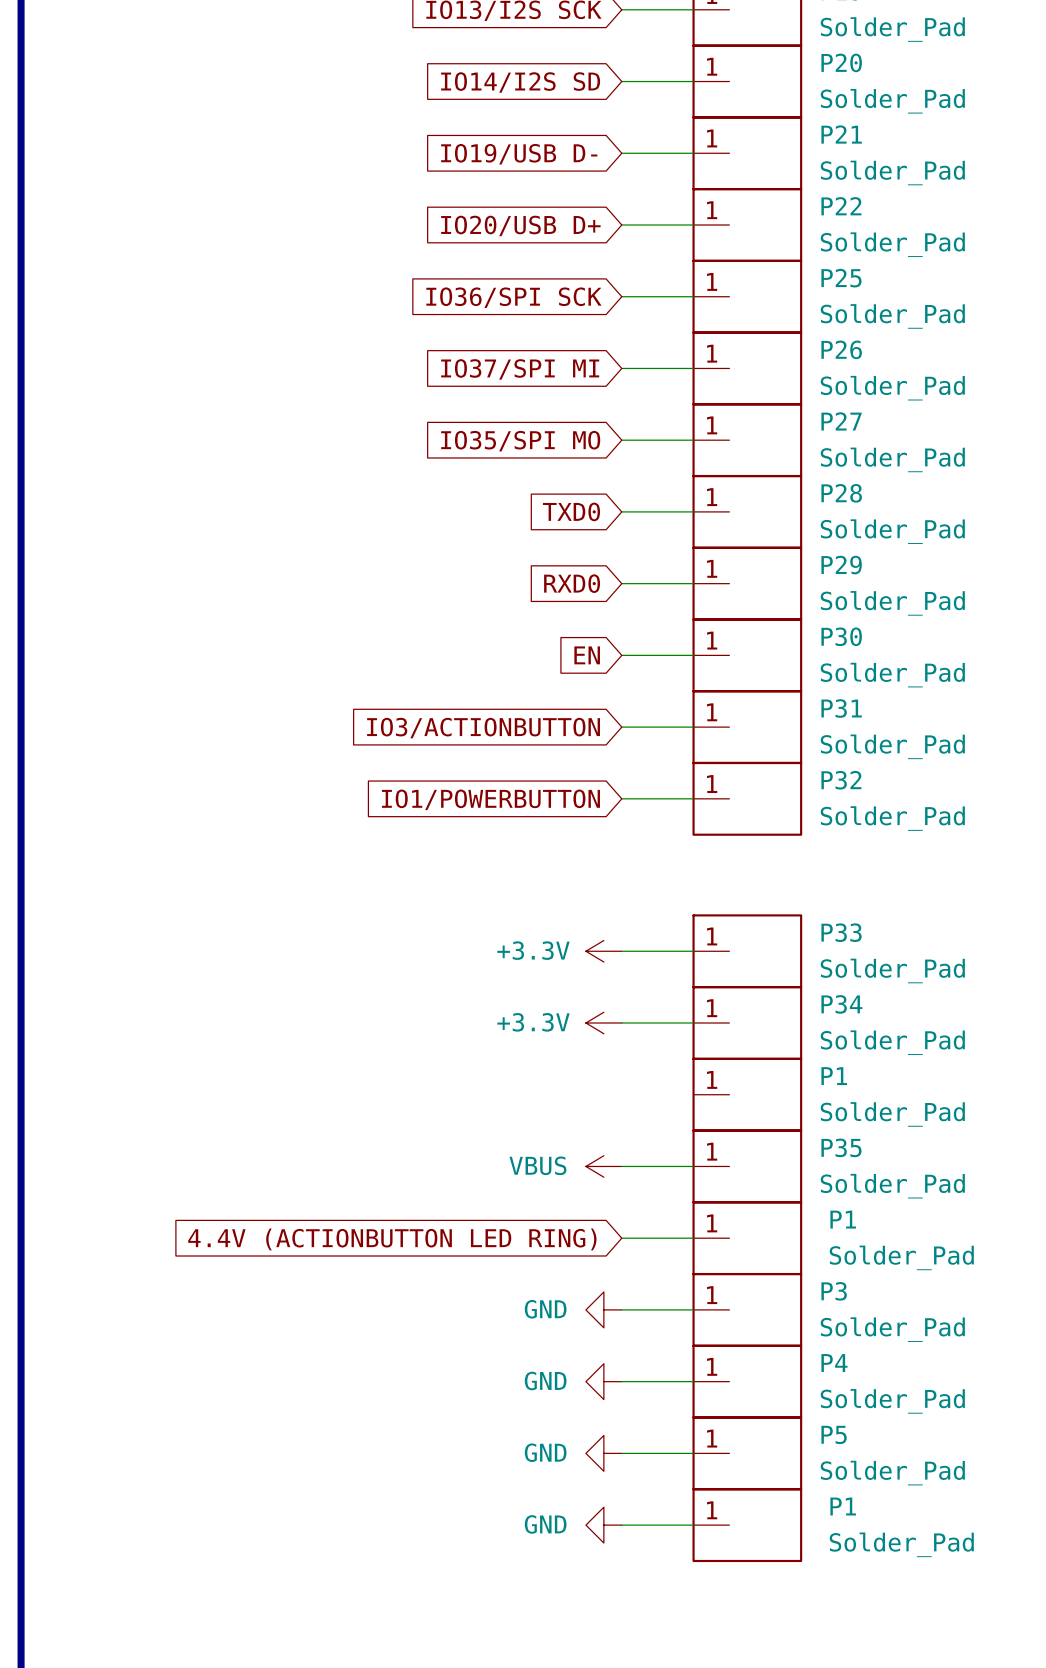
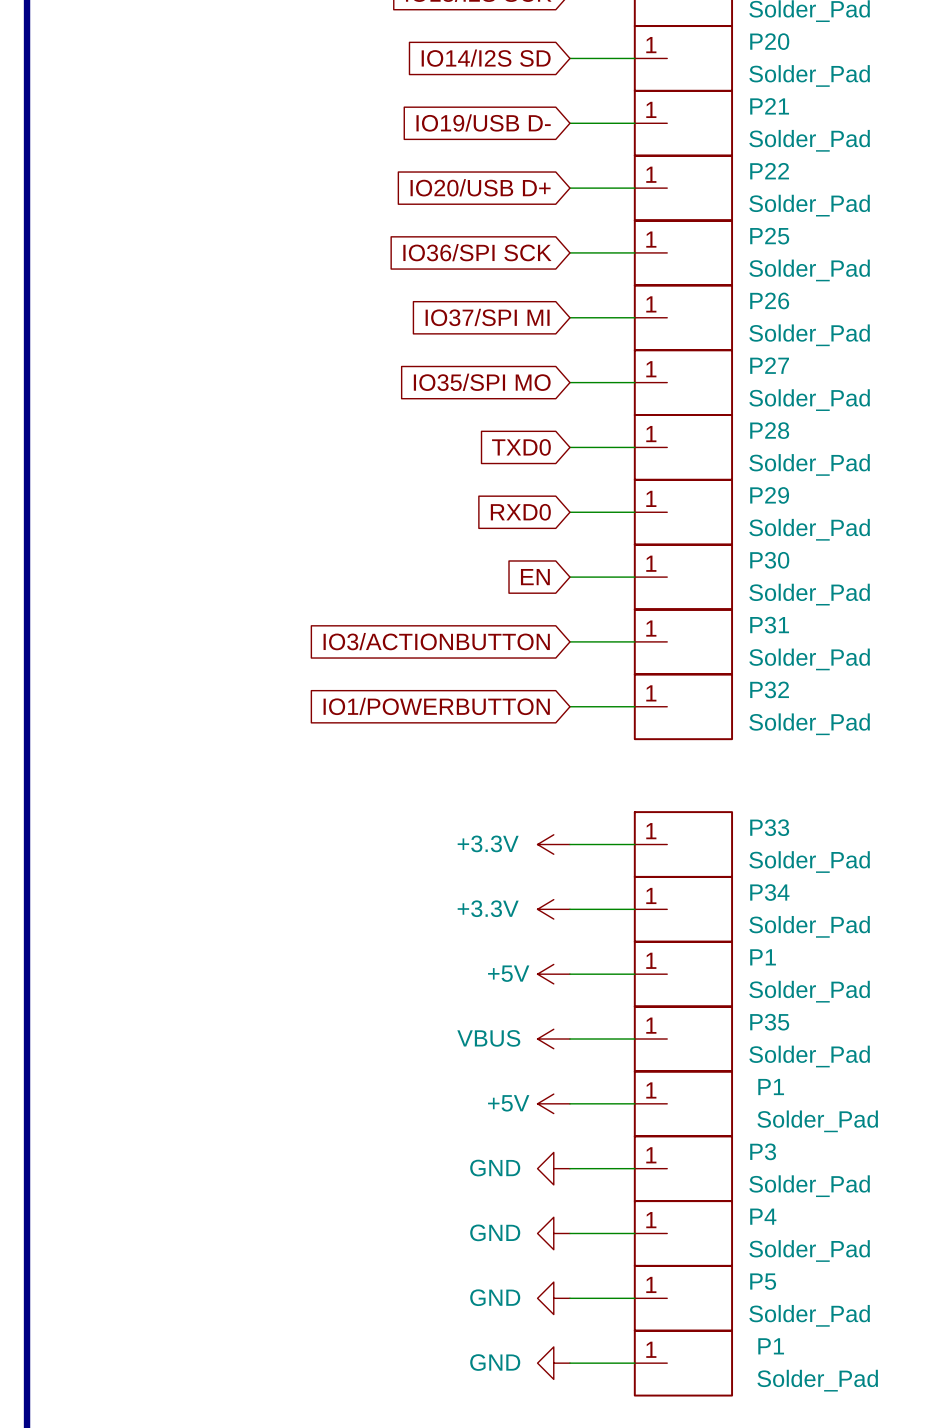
power symbol: none -> +5V (553, 974)
wire: none -> (569, 974) (634, 974)
power symbol: none -> +5V (553, 1103)
global label: 4.4V (ACTIONBUTTON LED RING) (392, 1239) -> none

